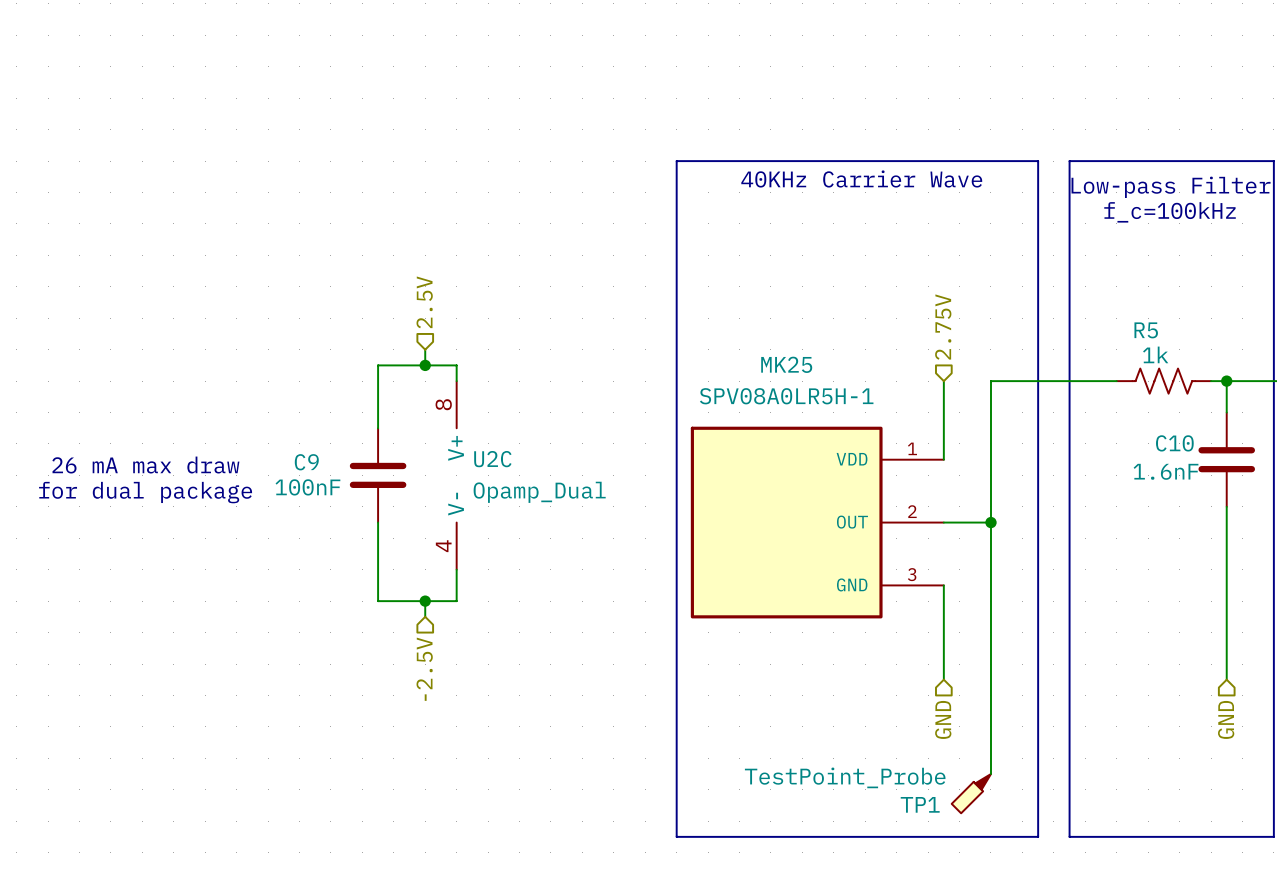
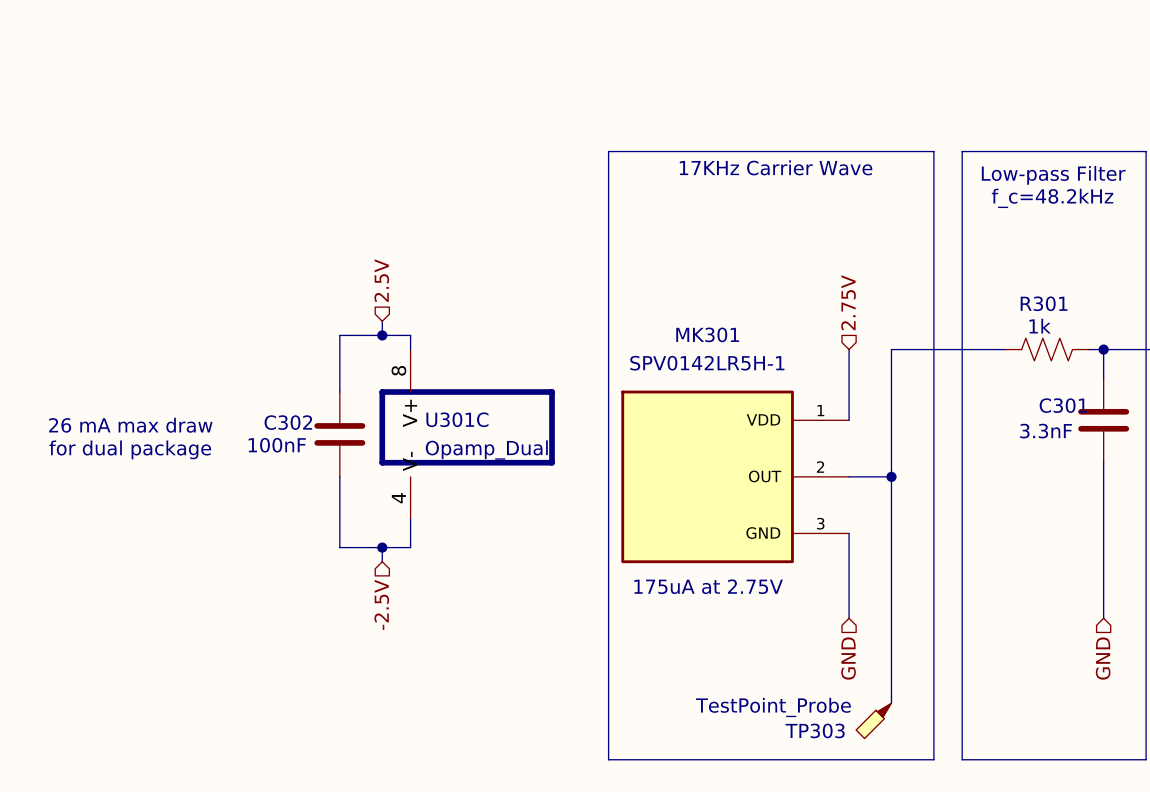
text: 40KHz Carrier Wave (861, 178) -> 17KHz Carrier Wave (776, 167)
text: f_c=100kHz (1170, 212) -> f_c=48.2kHz (1052, 198)
R5 name: R5 (1146, 330) -> R301 (1044, 303)
MK25 name: MK25 (786, 364) -> MK301 (707, 334)
MK25 value: SPV08A0LR5H-1 (786, 396) -> SPV0142LR5H-1 (707, 363)
line: none -> (382, 392) (552, 392) (552, 462) (382, 462) (382, 392)
C10 name: C10 (1174, 443) -> C301 (1063, 405)
U2C name: U2C (492, 459) -> U301C (457, 419)
C9 name: C9 (306, 462) -> C302 (288, 422)
C10 value: 1.6nF (1166, 471) -> 3.3nF (1046, 431)
text: none -> 175uA at 2.75V (708, 586)
TP1 name: TP1 (920, 804) -> TP303 (815, 730)

